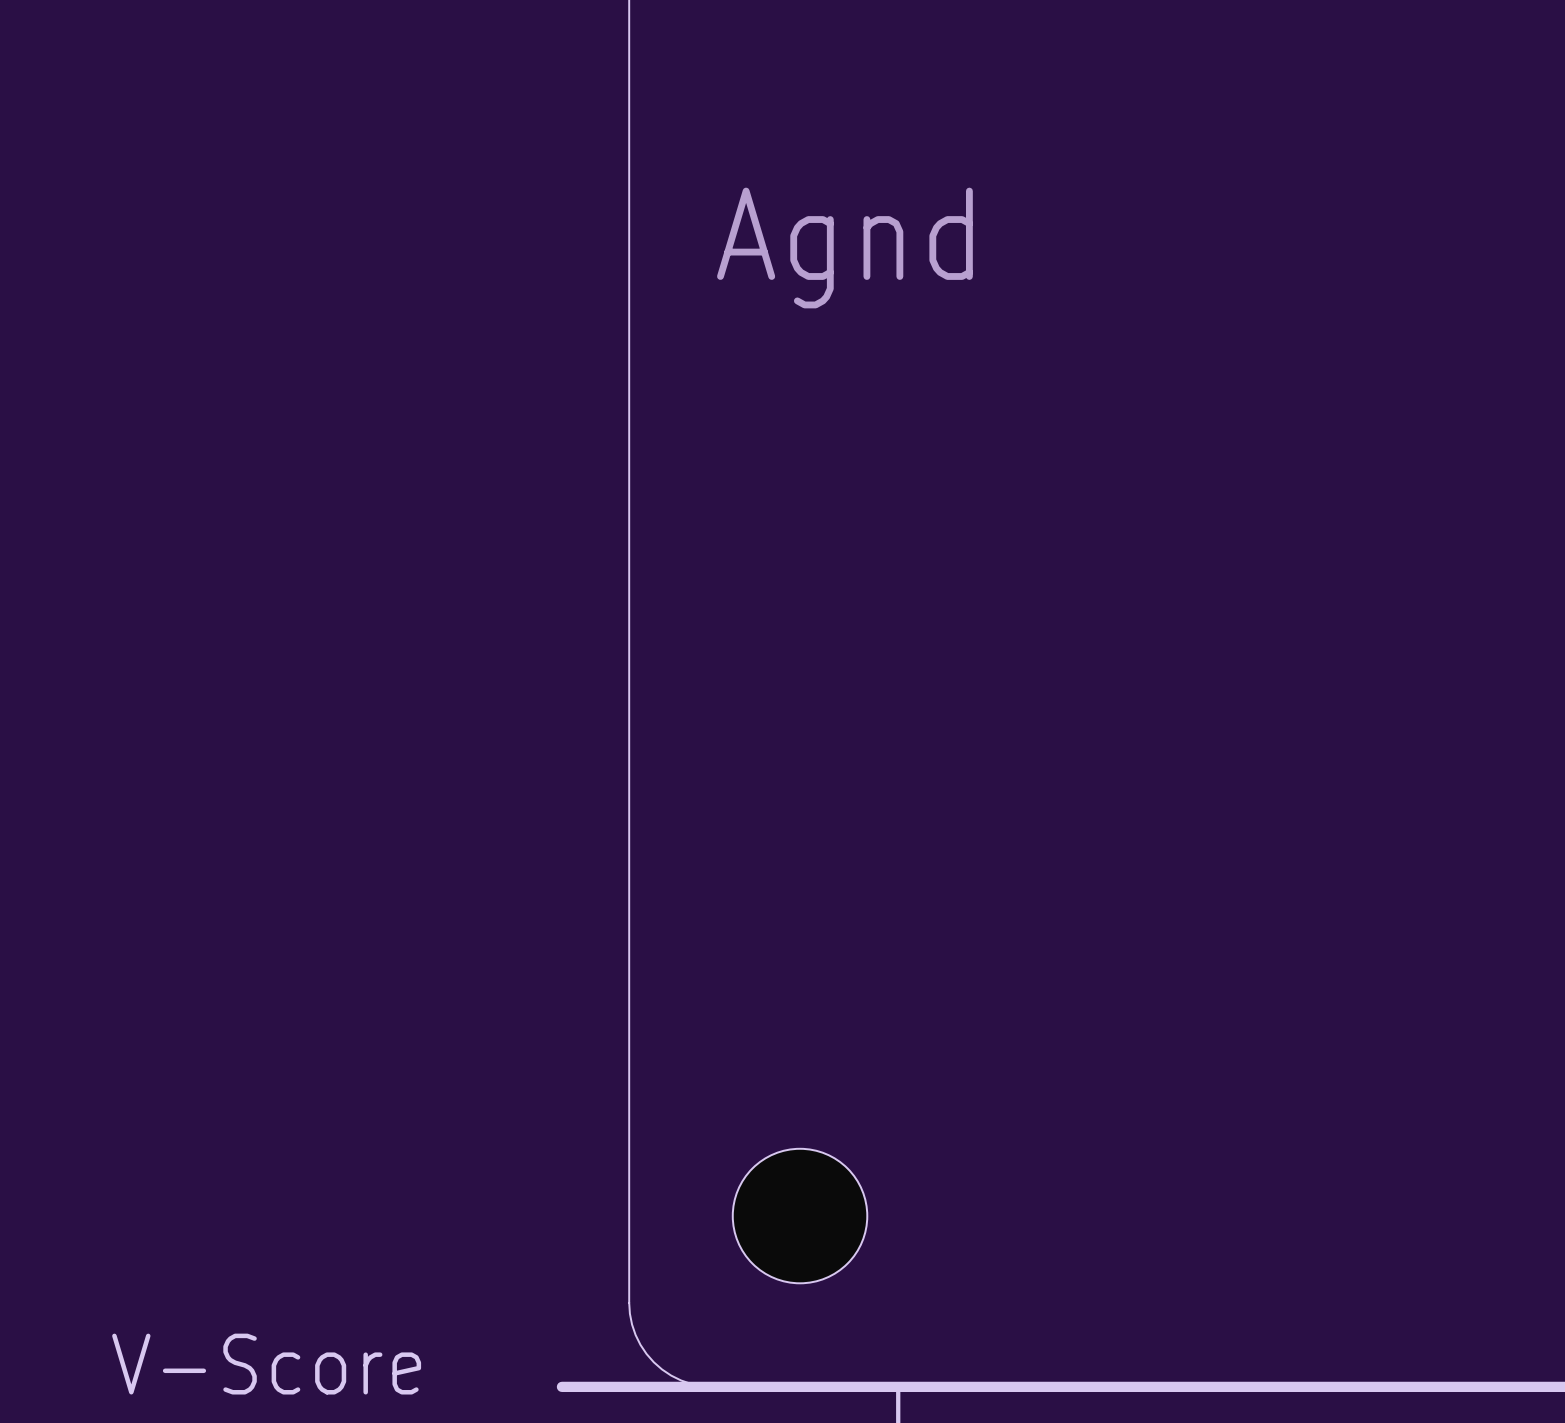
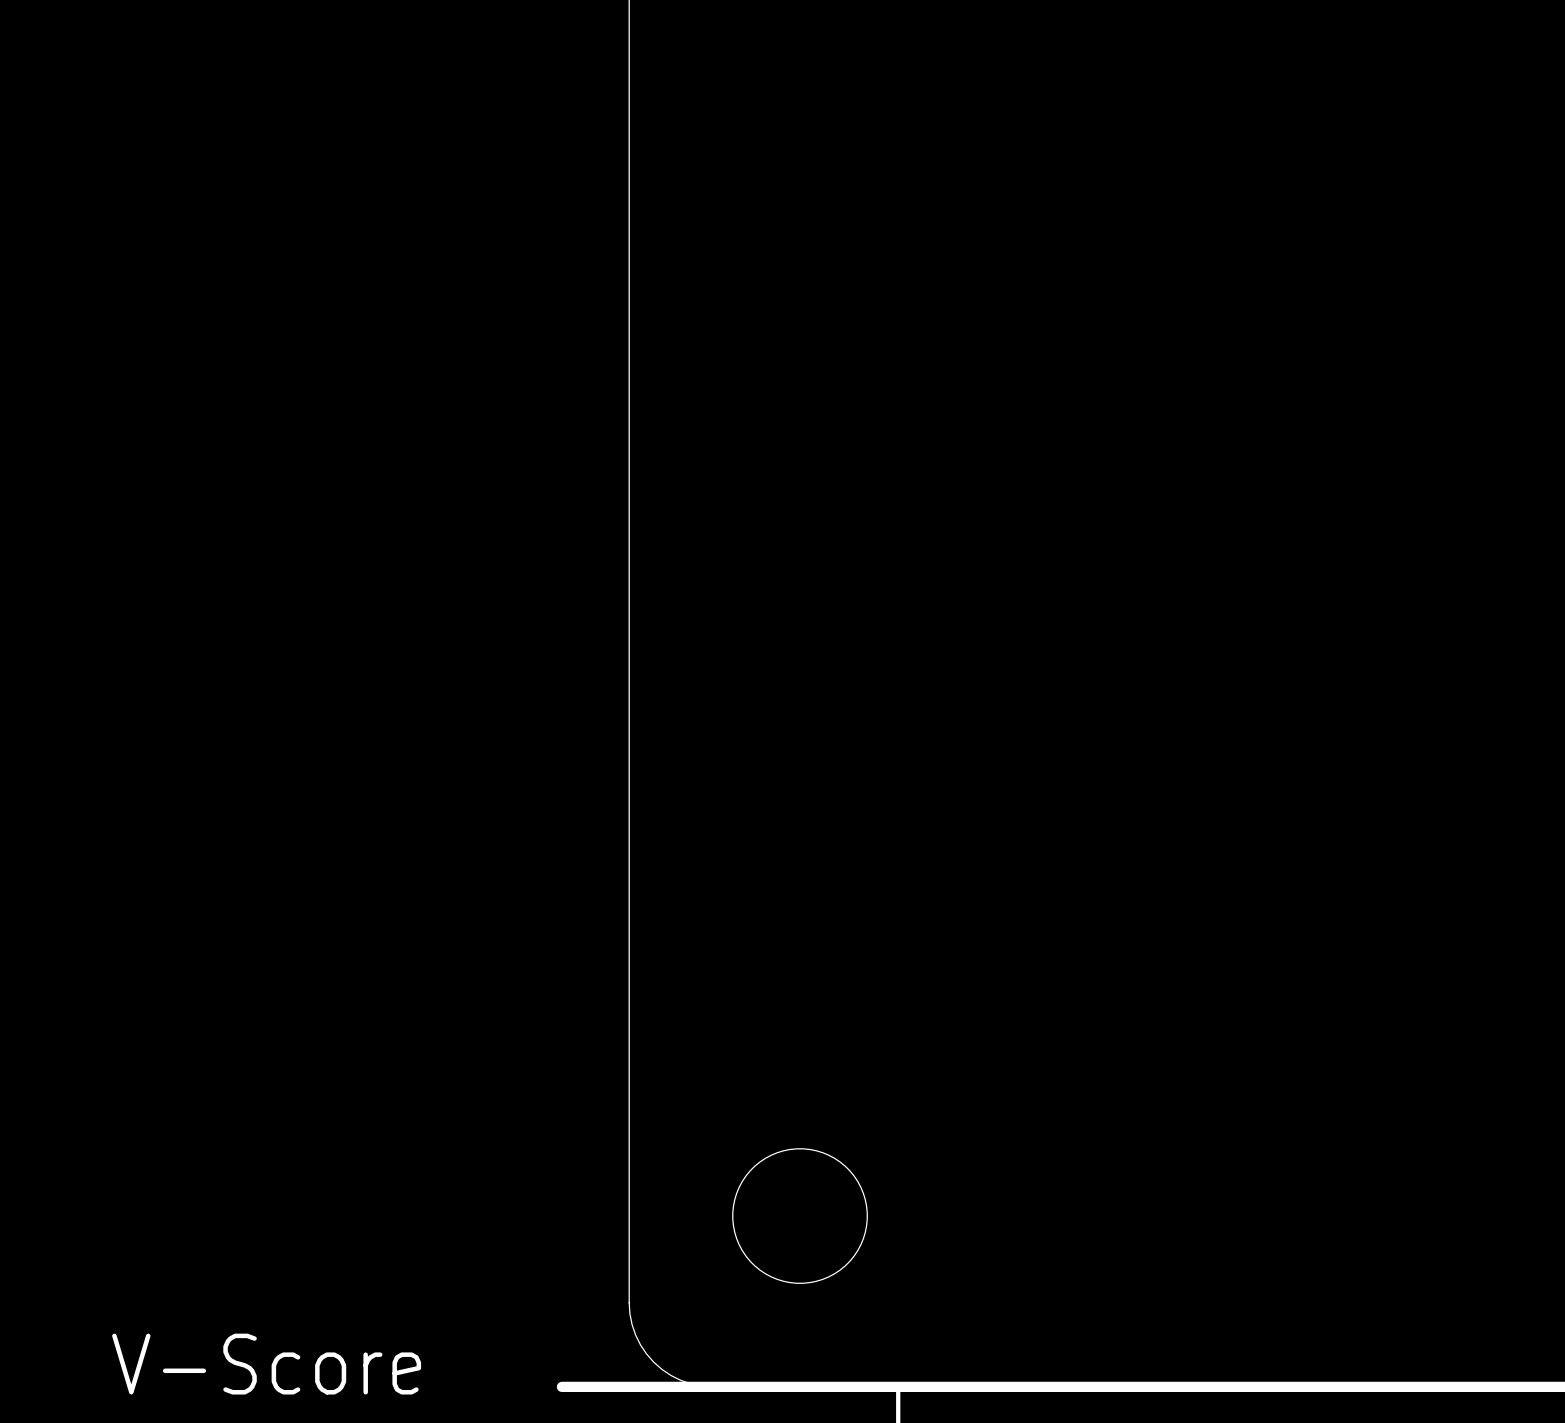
text: Agnd (844, 248) -> none

